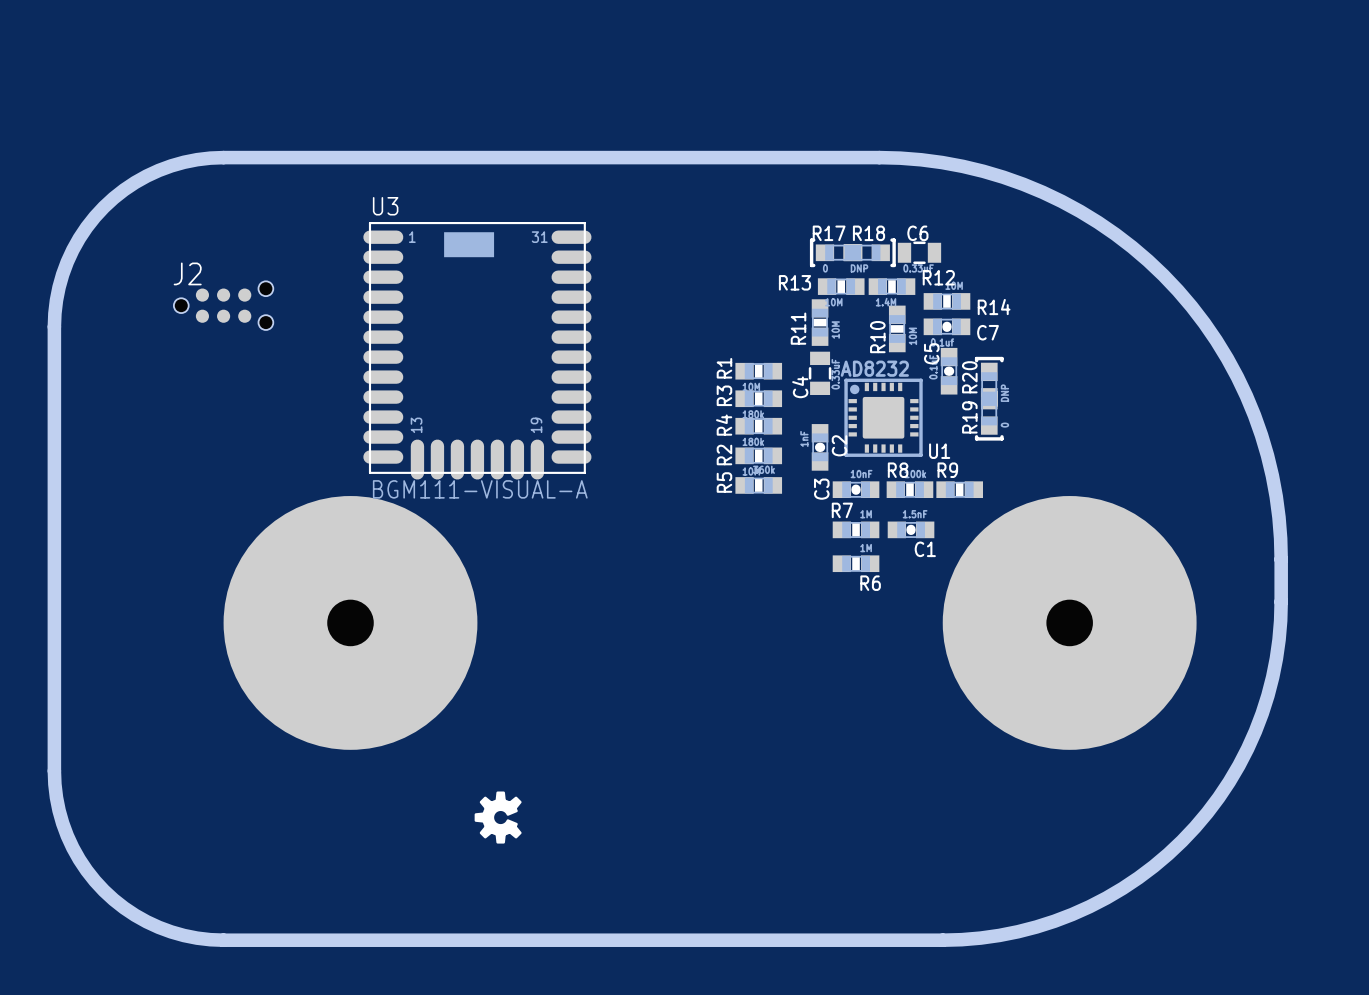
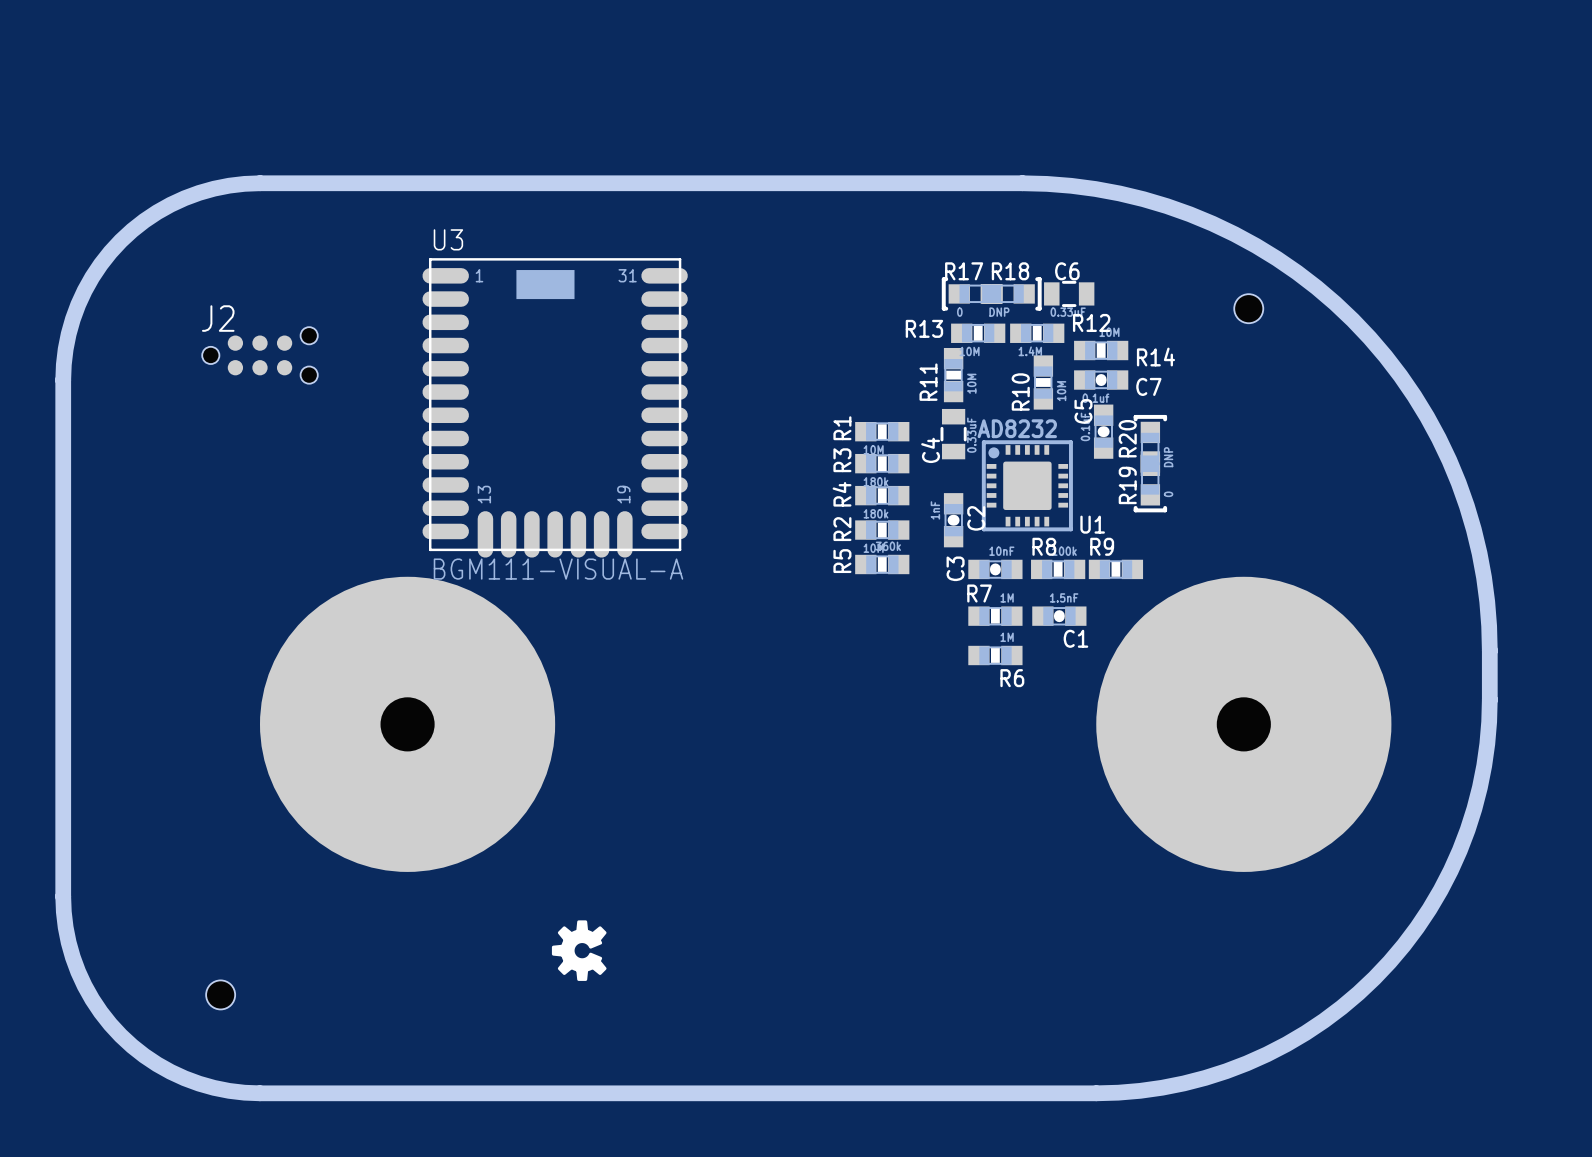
hole: none -> (1248, 308)
hole: none -> (220, 994)

